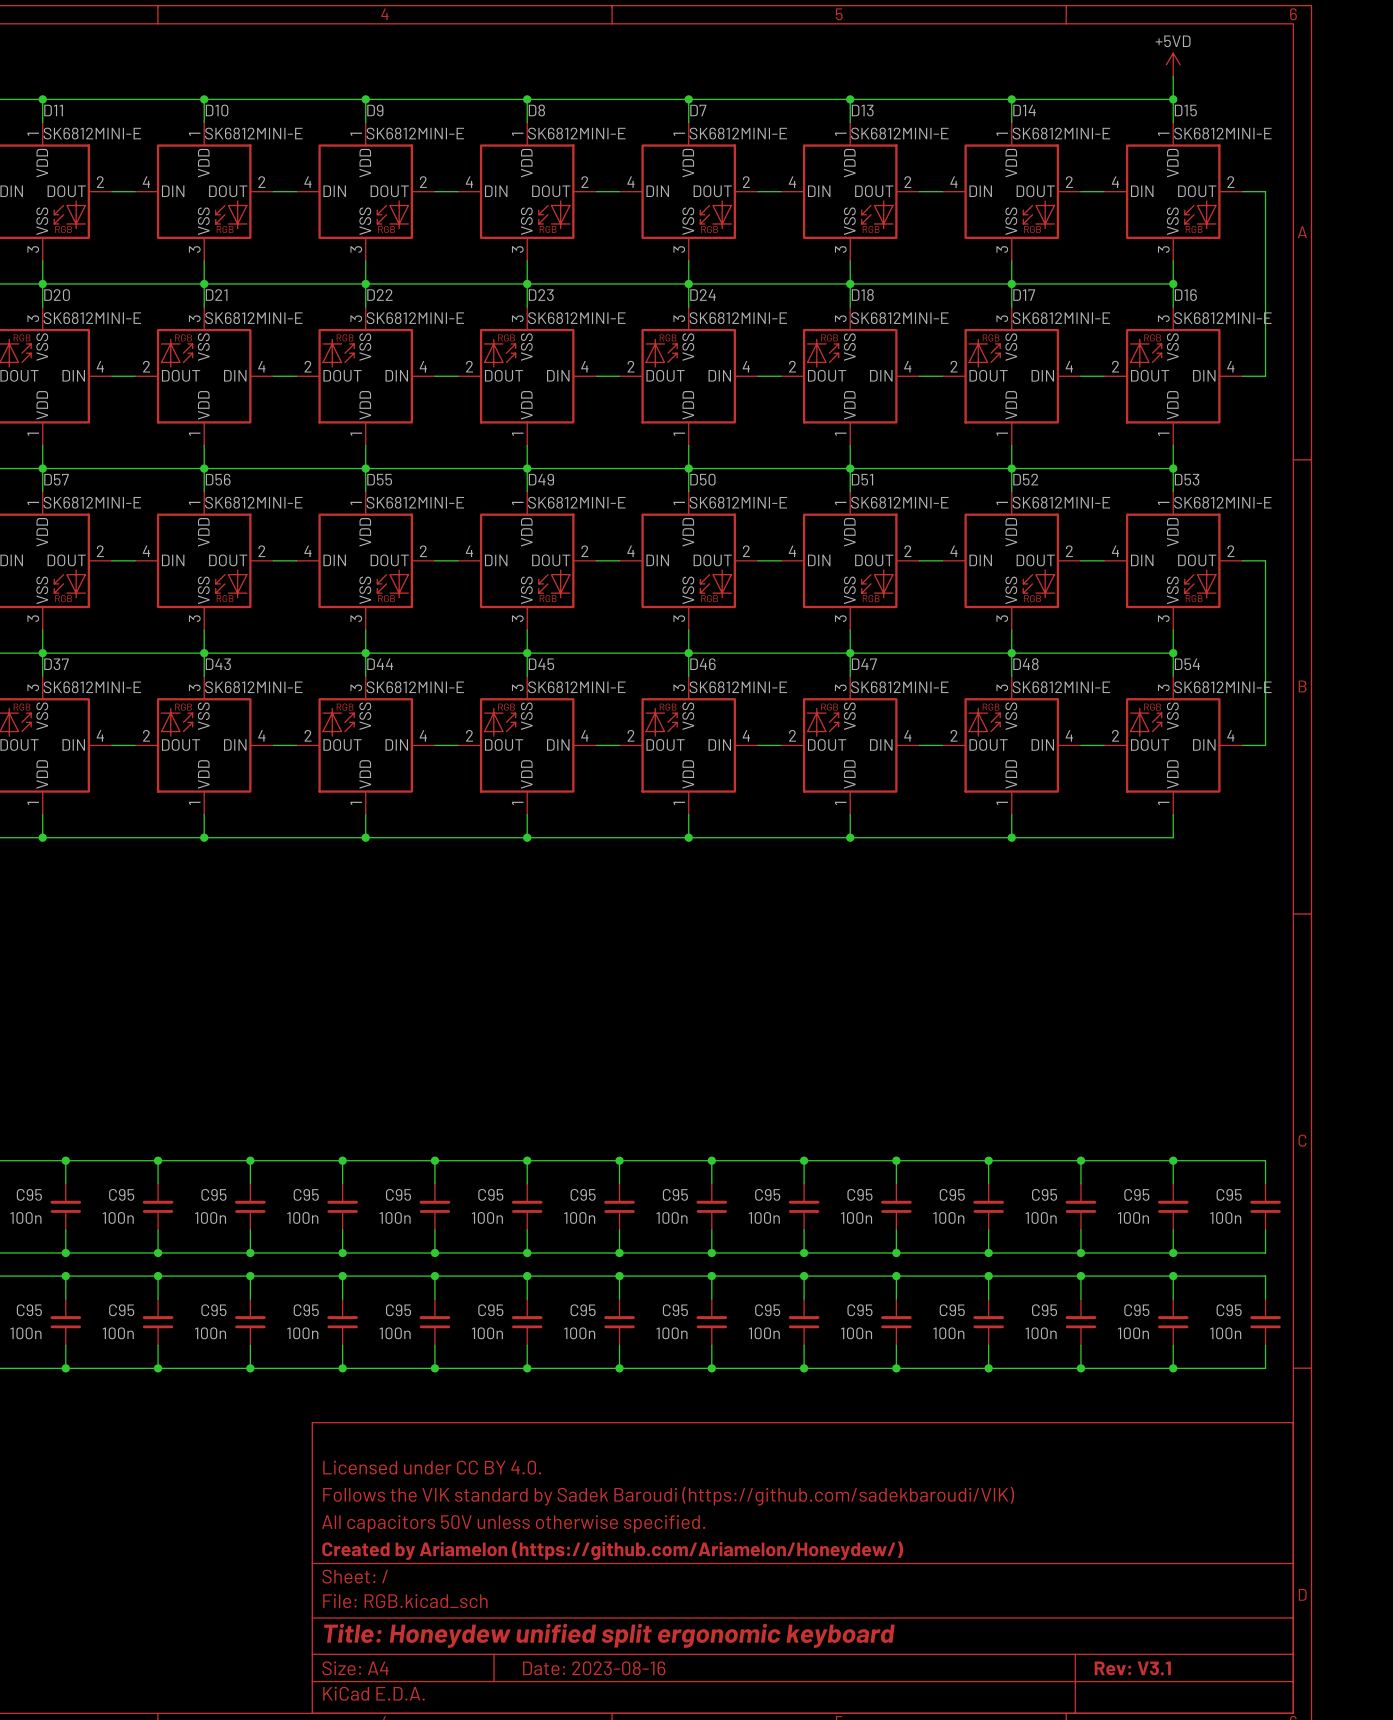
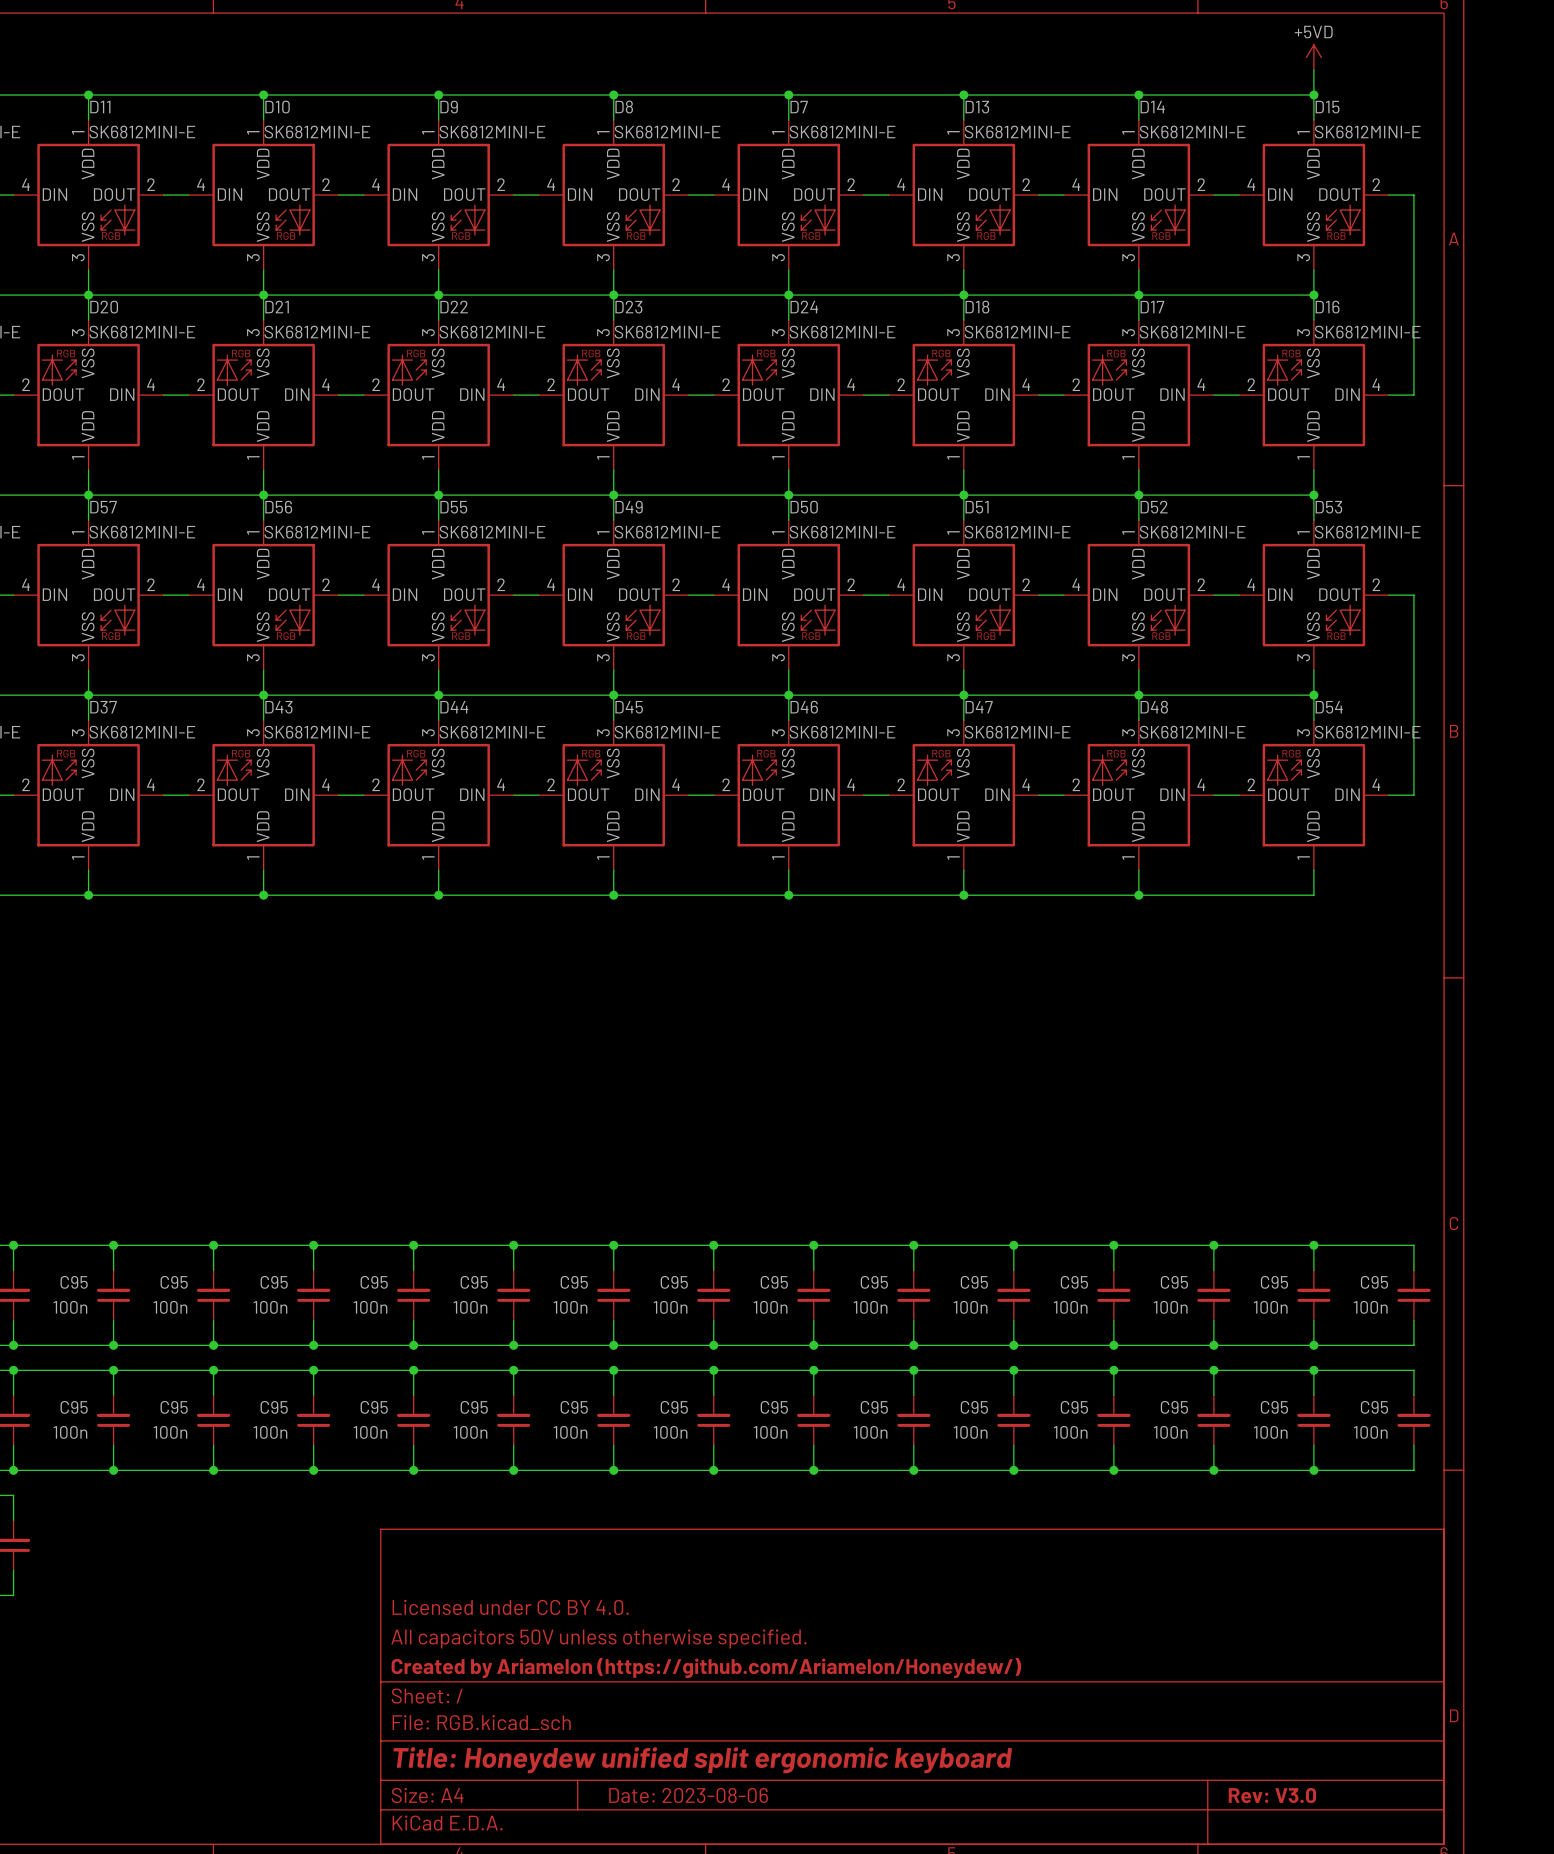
title block: Licensed under CC BY 4.0. (432, 1467) -> none
title block: Follows the VIK standard by Sadek Baroudi (https://github.com/sadekbaroudi/VIK) (668, 1496) -> Licensed under CC BY 4.0. (510, 1607)
title block: Date: 2023-08-16 (594, 1668) -> Date: 2023-08-06 (688, 1795)
title block: Rev: V3.1 (1132, 1668) -> Rev: V3.0 (1272, 1795)

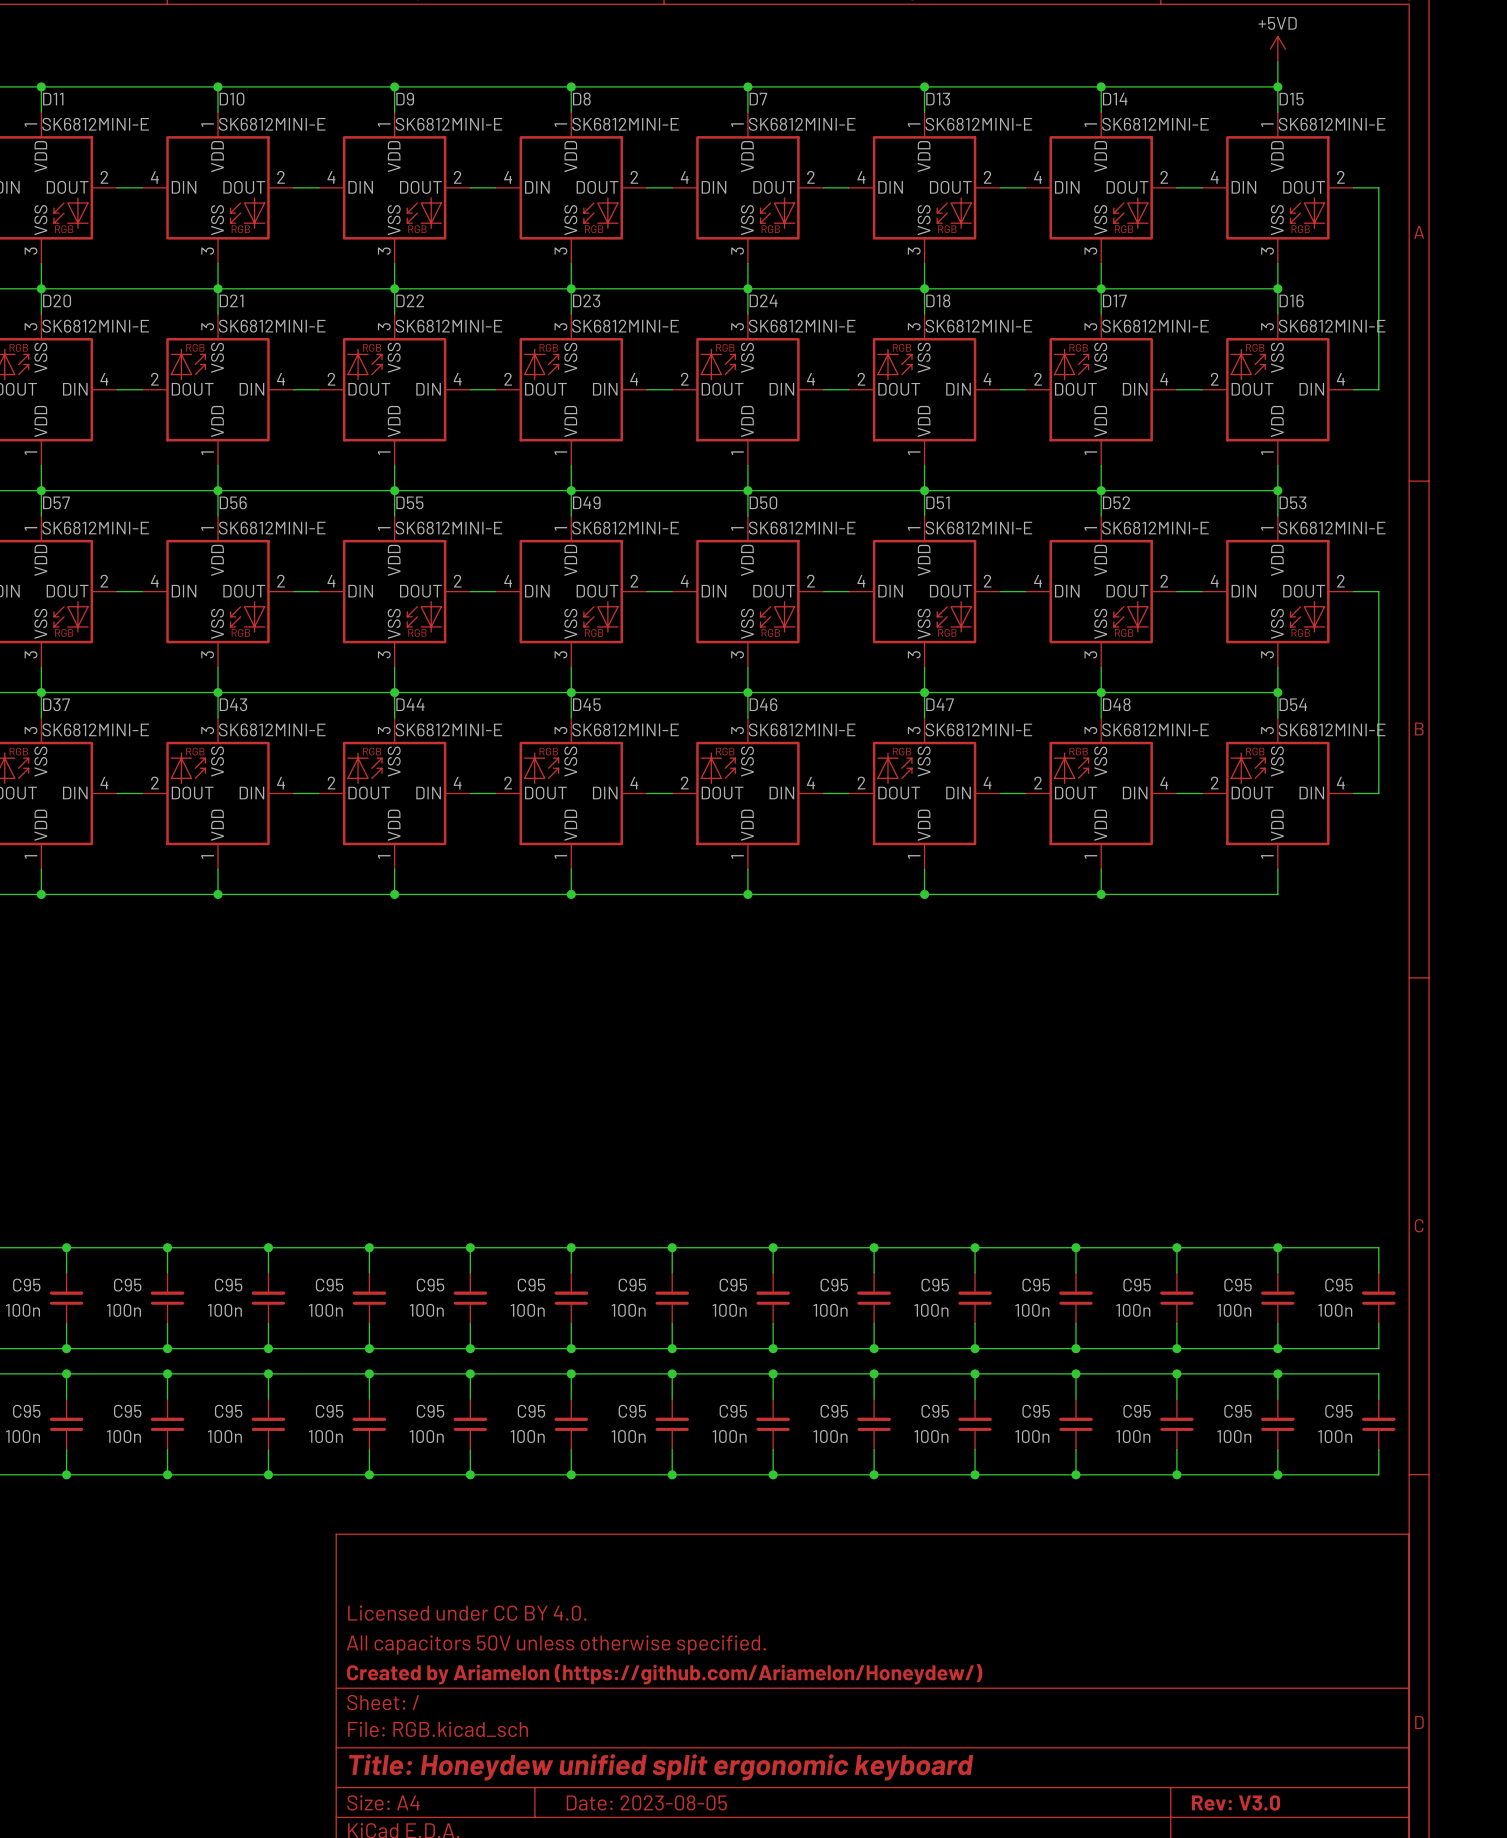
title block: Date: 2023-08-06 (688, 1795) -> Date: 2023-08-05 (646, 1802)

